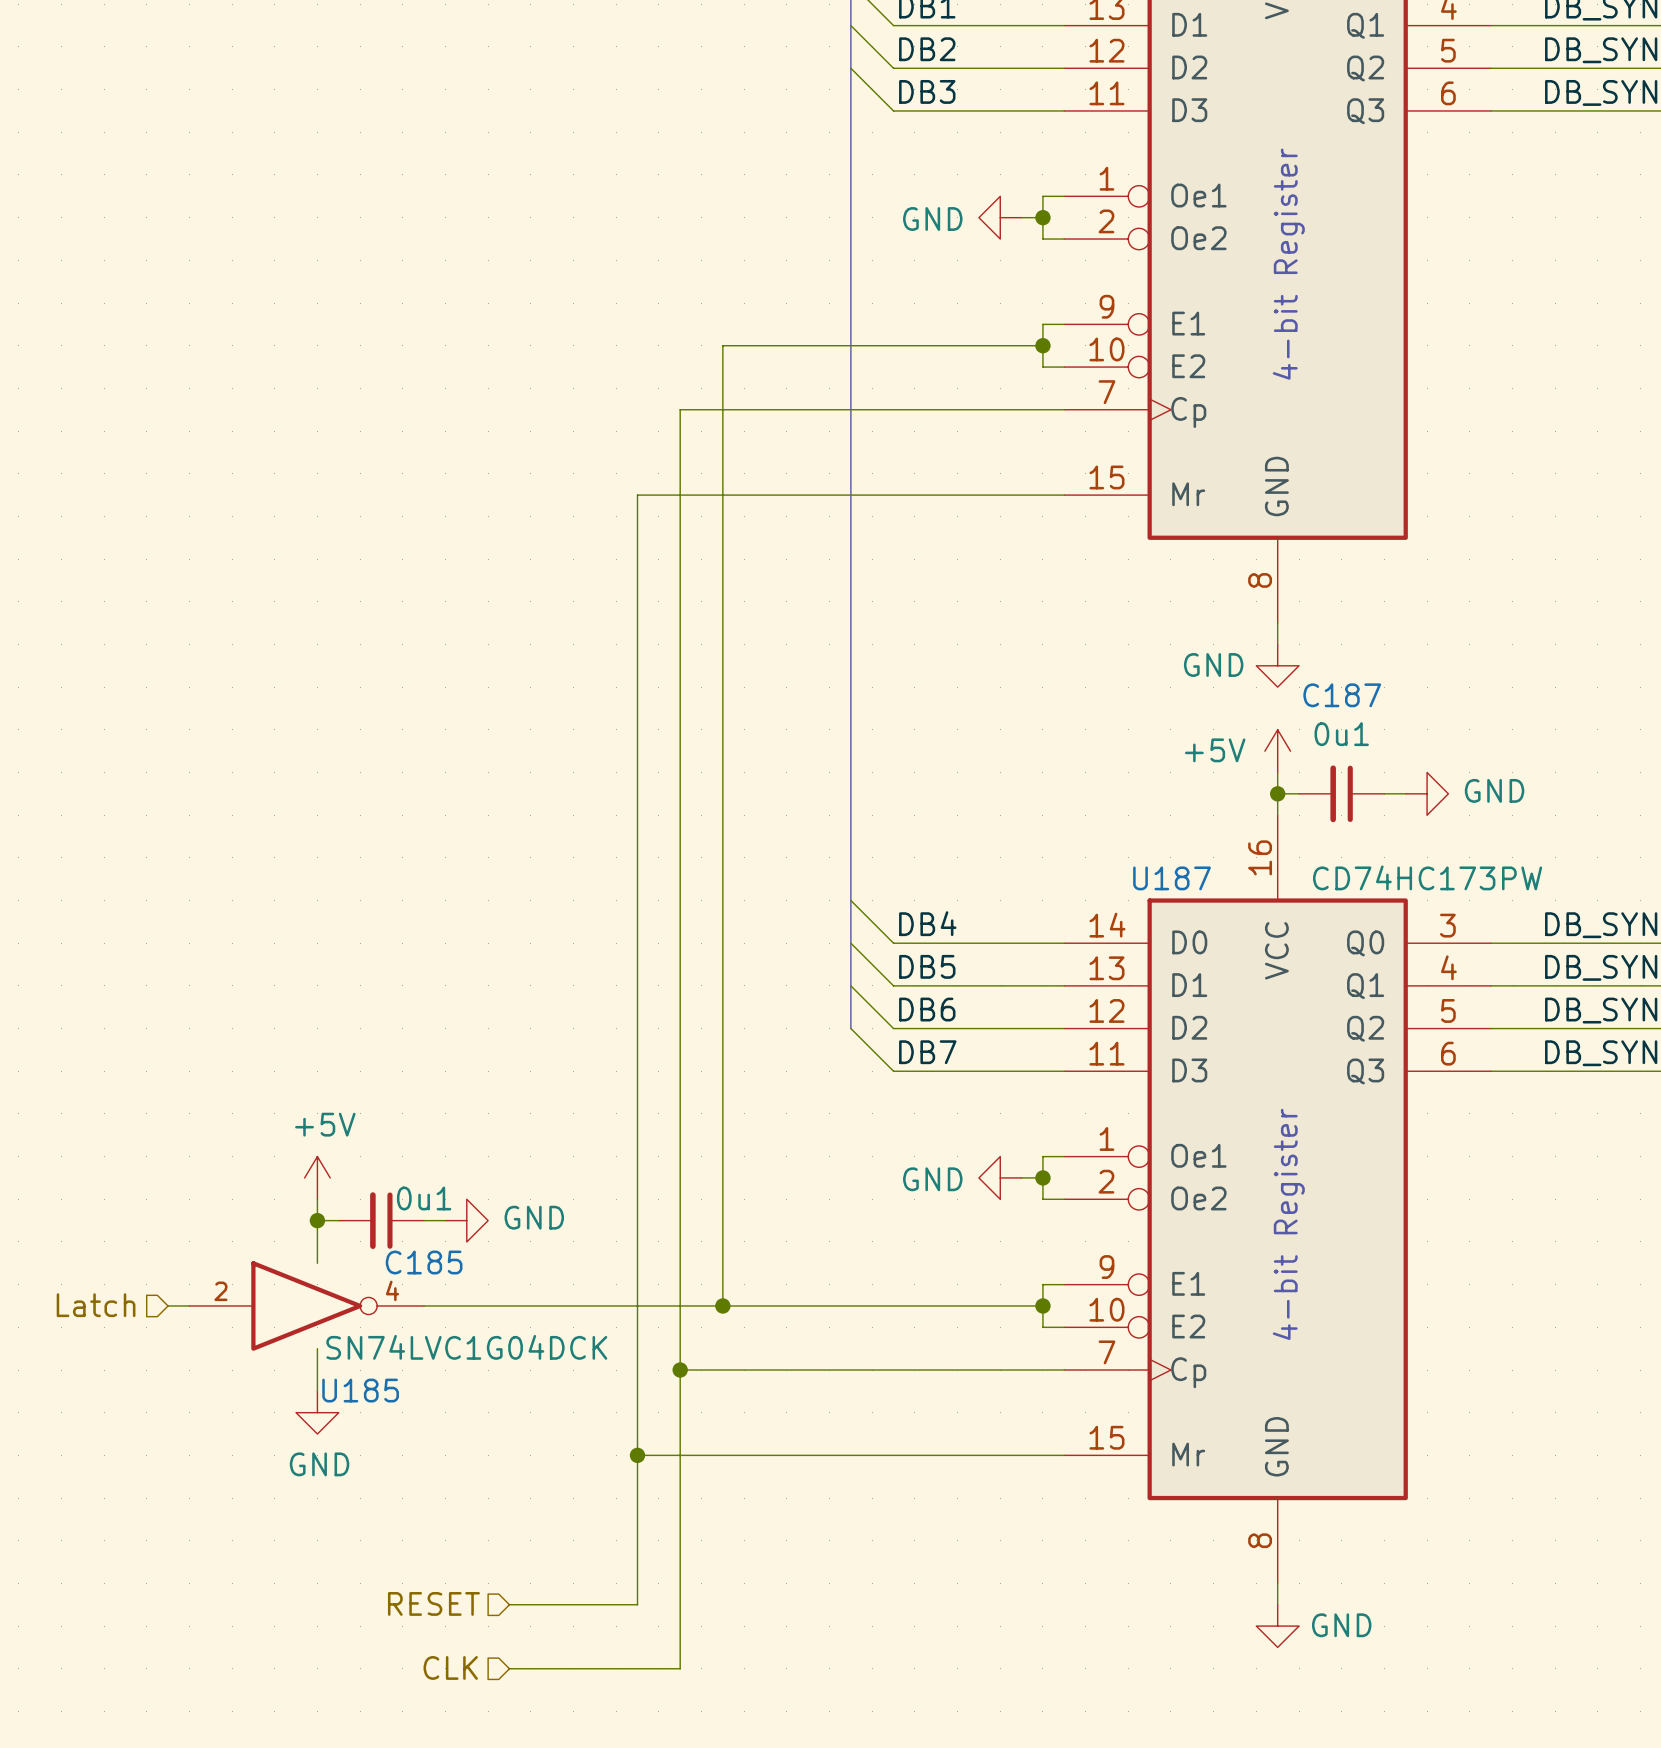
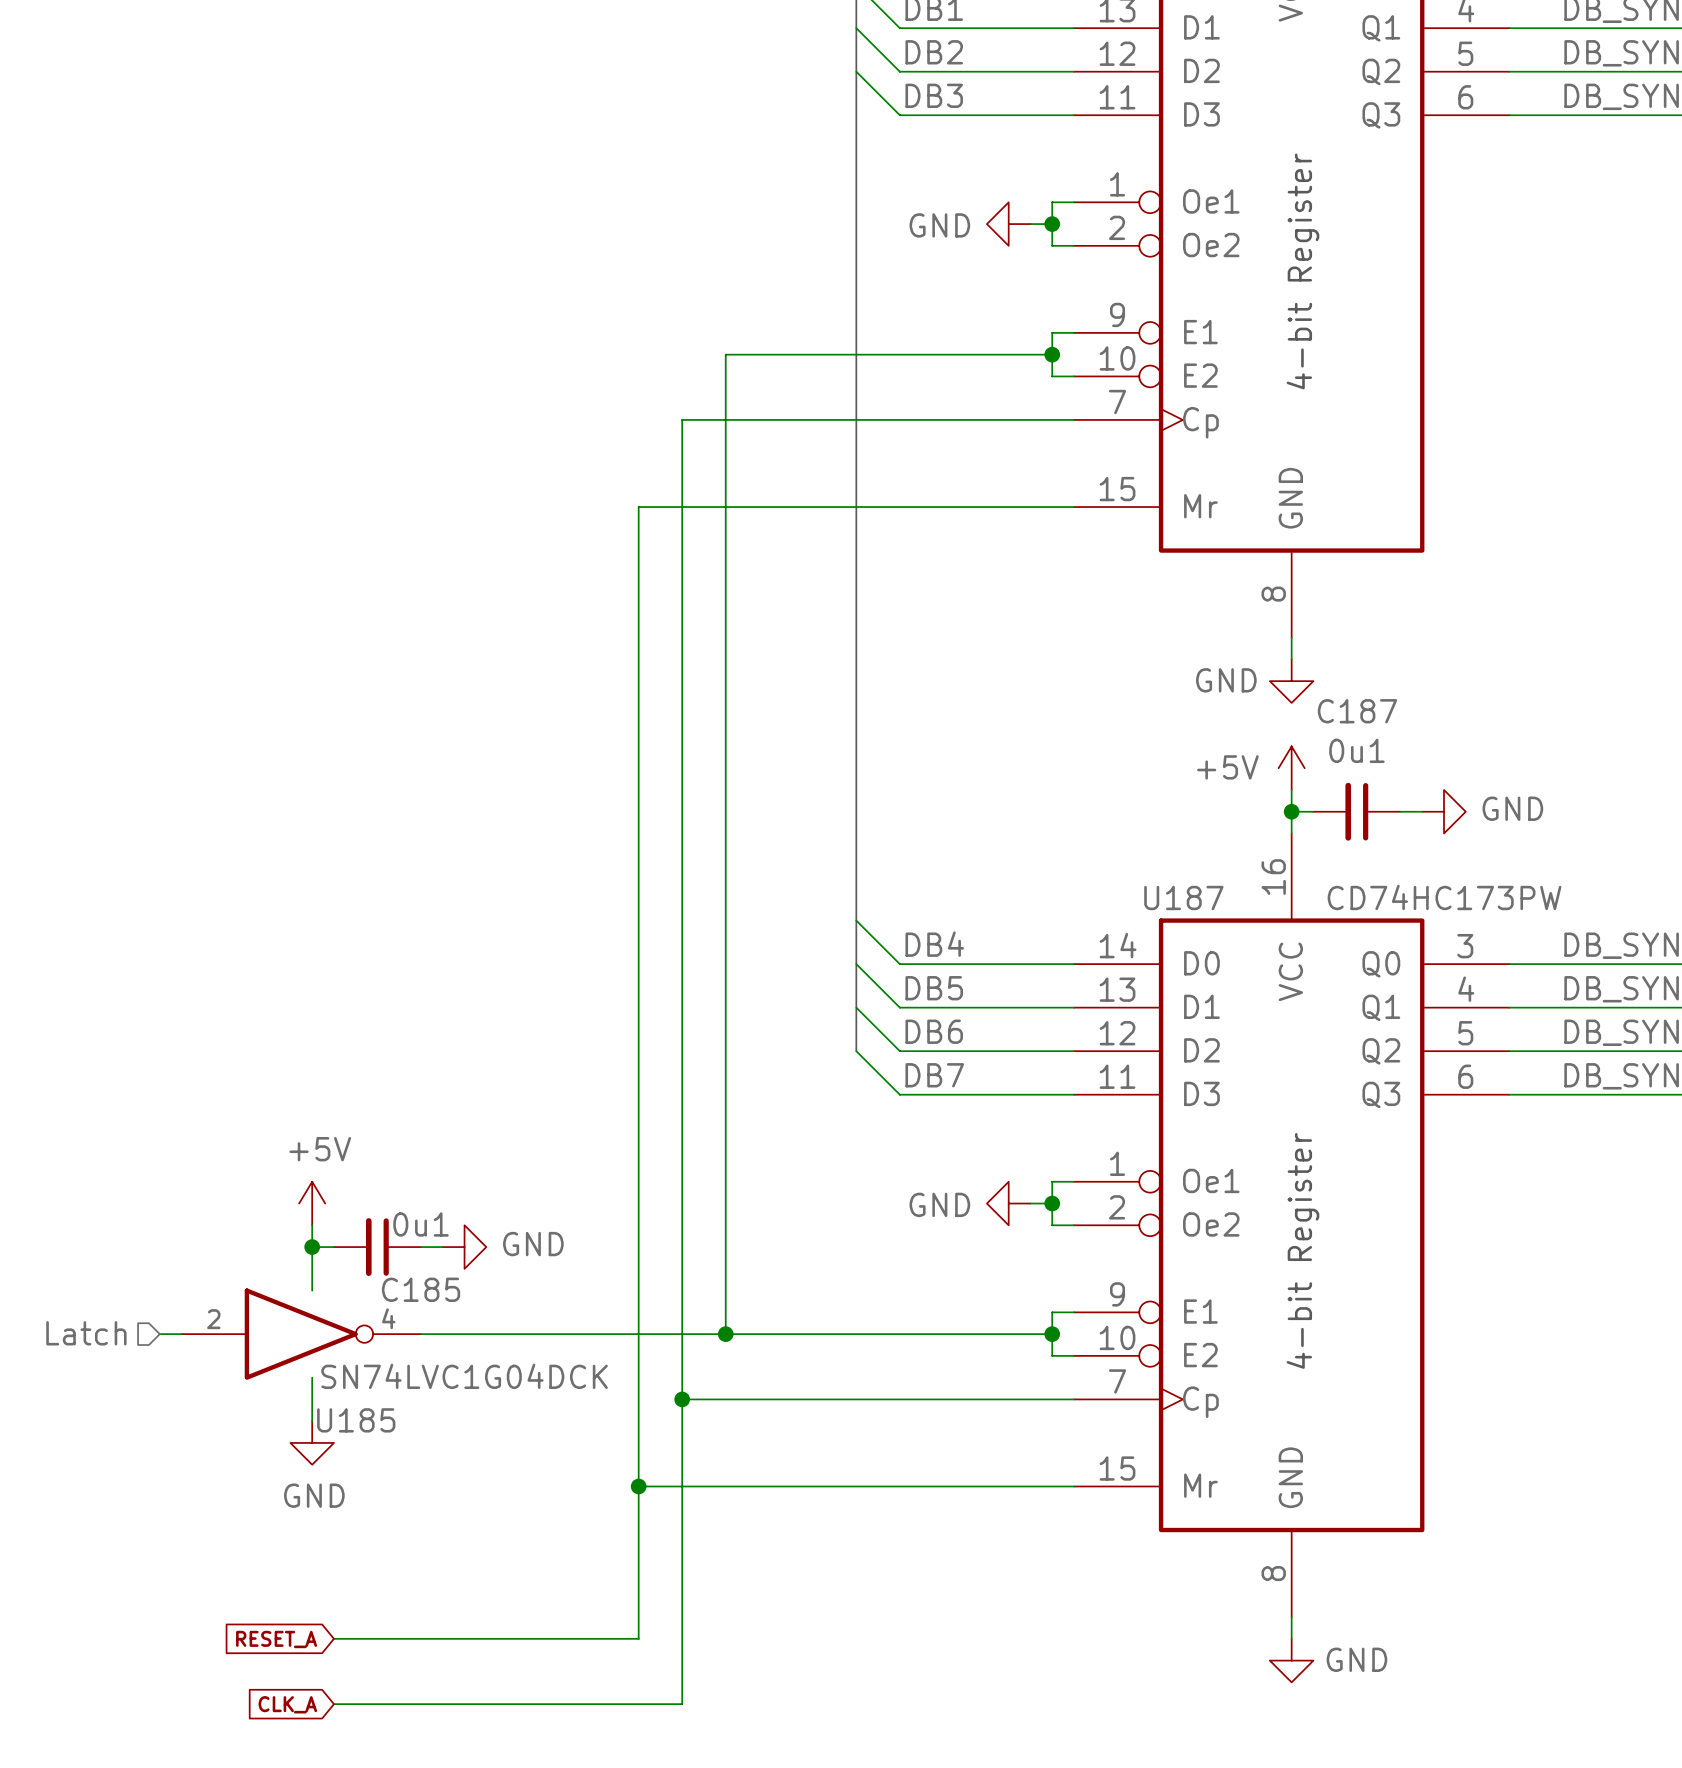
hierarchical label: RESET (433, 1603) -> none
wire: none -> (333, 1638) (508, 1638)
global label: none -> RESET_A (276, 1639)
hierarchical label: CLK (450, 1667) -> none
wire: none -> (333, 1704) (508, 1704)
global label: none -> CLK_A (287, 1704)

